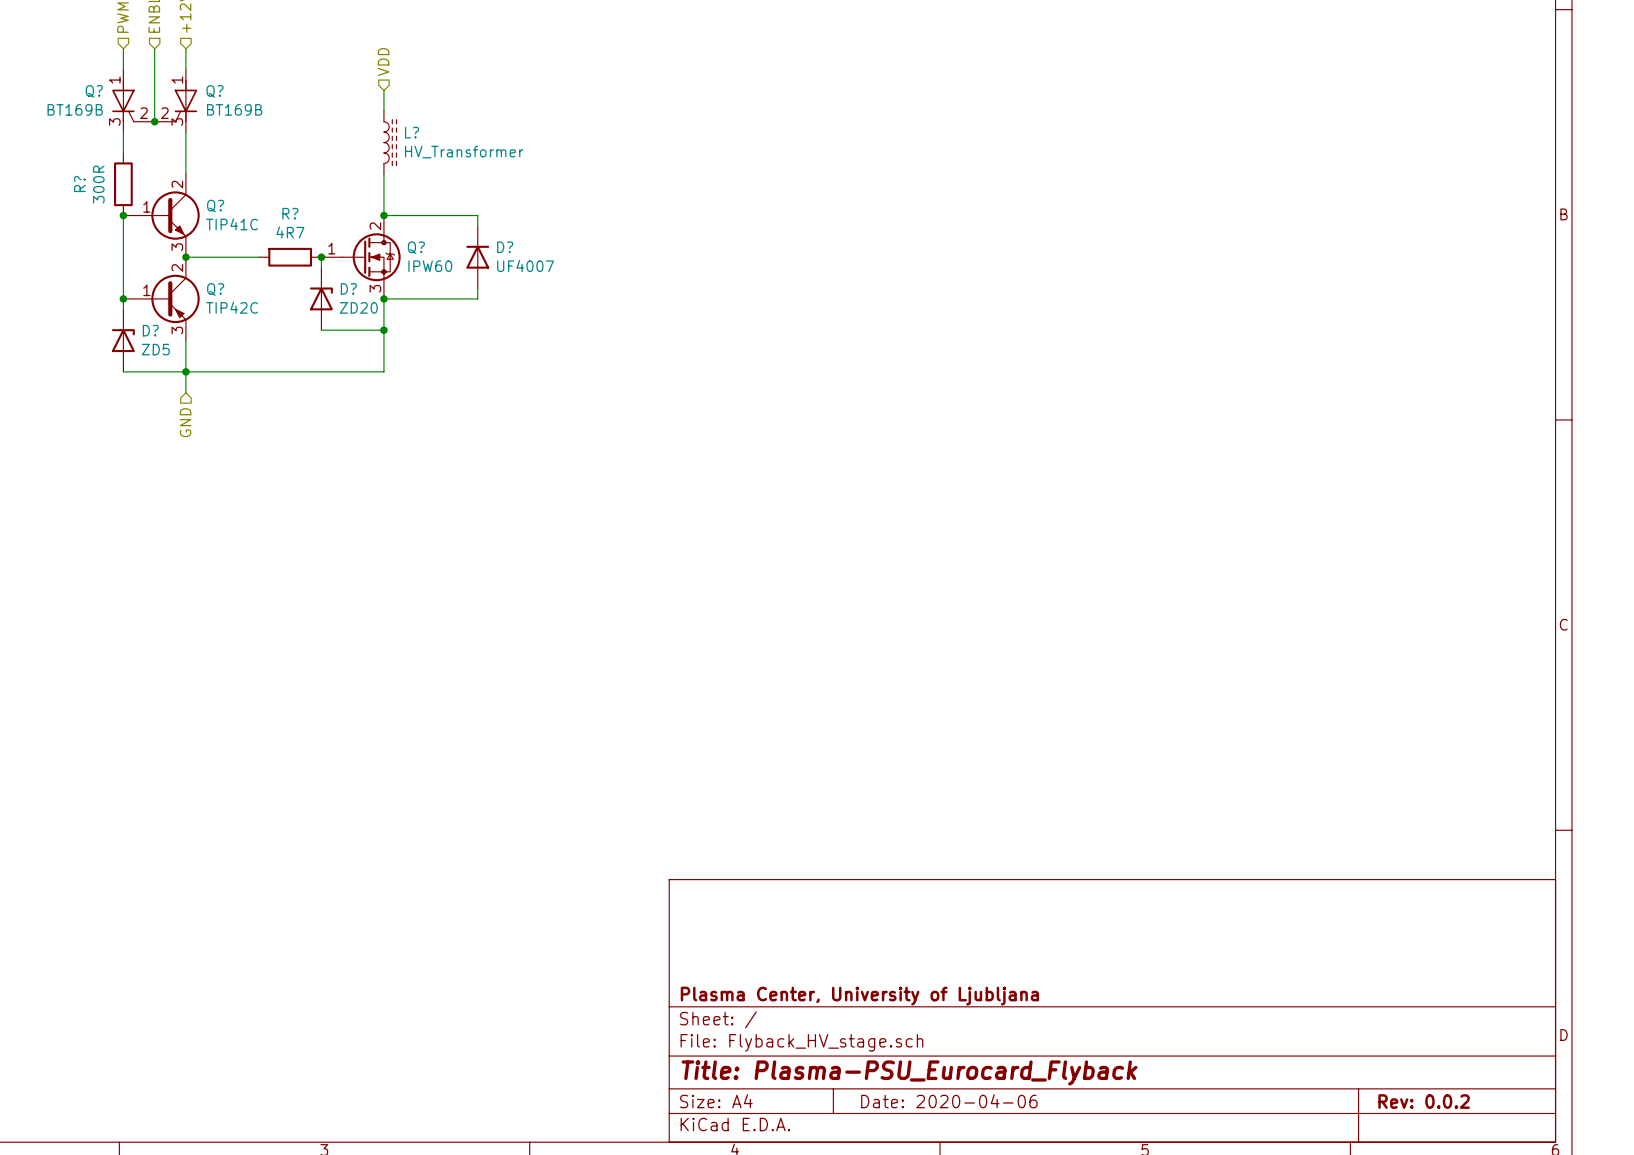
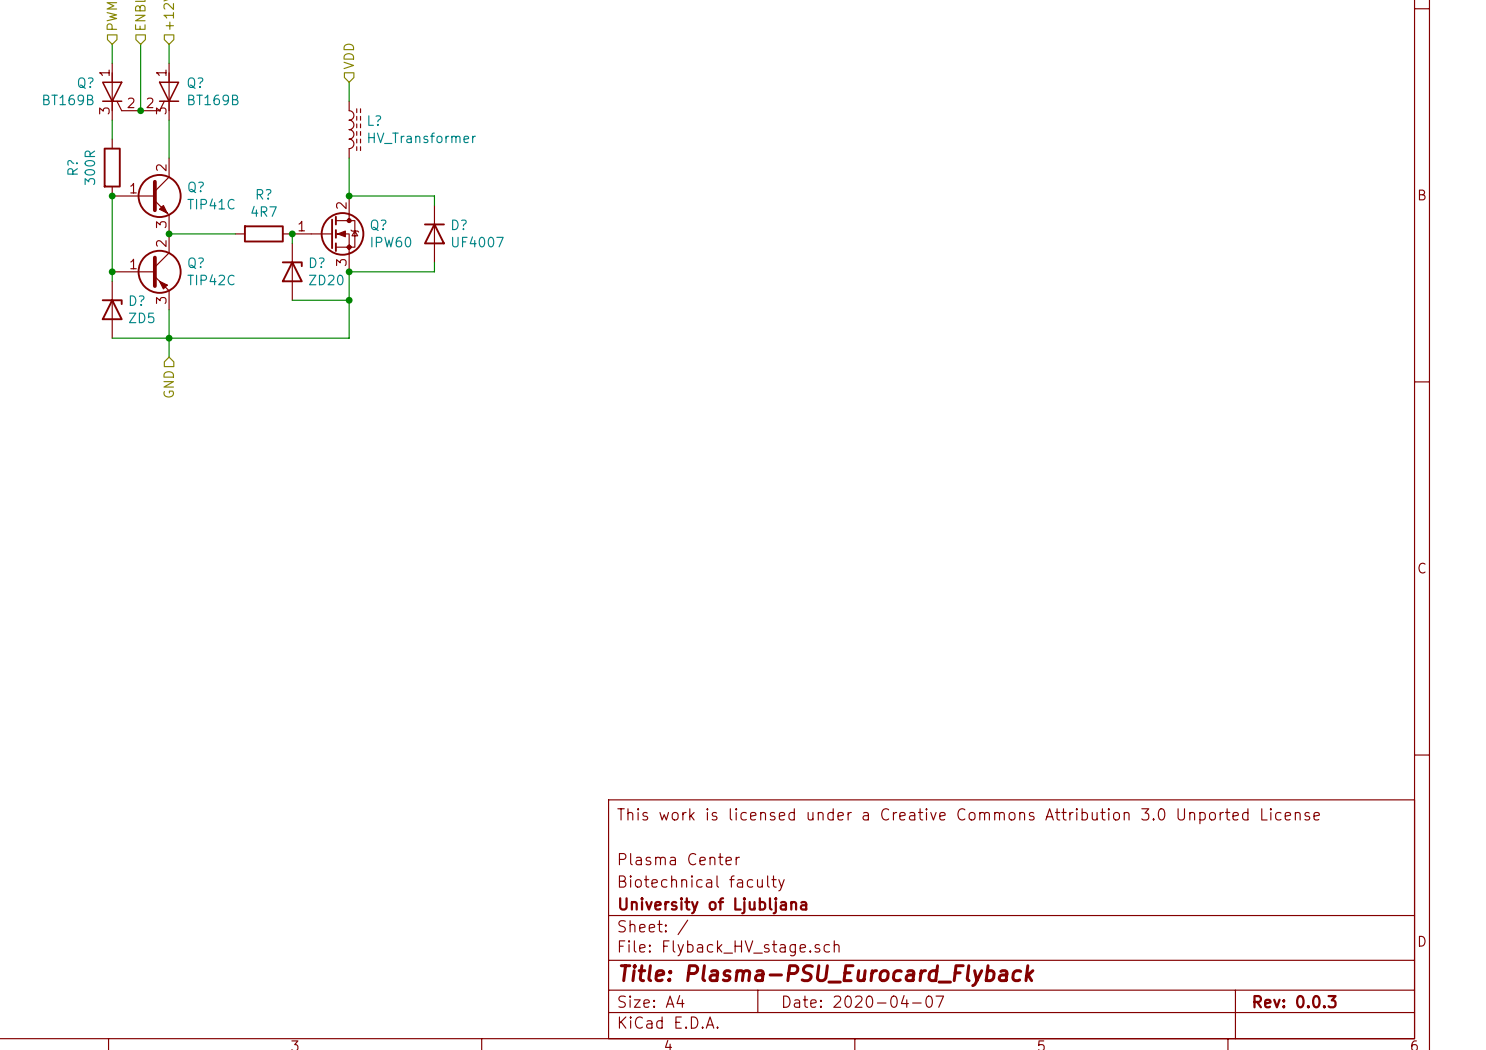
title block: none -> This work is licensed under a Creative Commons Attribution 3.0 Unported License (968, 816)
title block: none -> Plasma Center (679, 859)
title block: none -> Biotechnical faculty (701, 883)
title block: Plasma Center, University of Ljubljana (859, 996) -> University of Ljubljana (713, 905)
title block: Date: 2020-04-06 (949, 1101) -> Date: 2020-04-07 (863, 1001)
title block: Rev: 0.0.2 (1424, 1101) -> Rev: 0.0.3 (1295, 1001)

